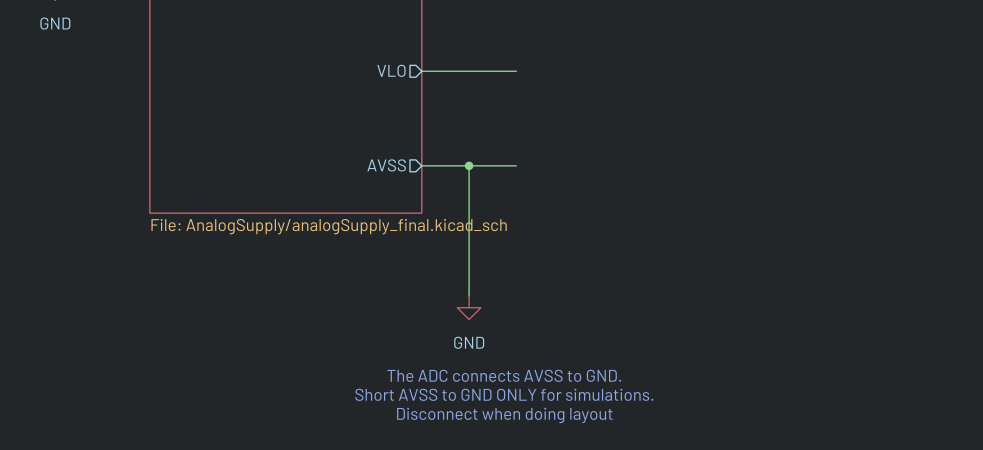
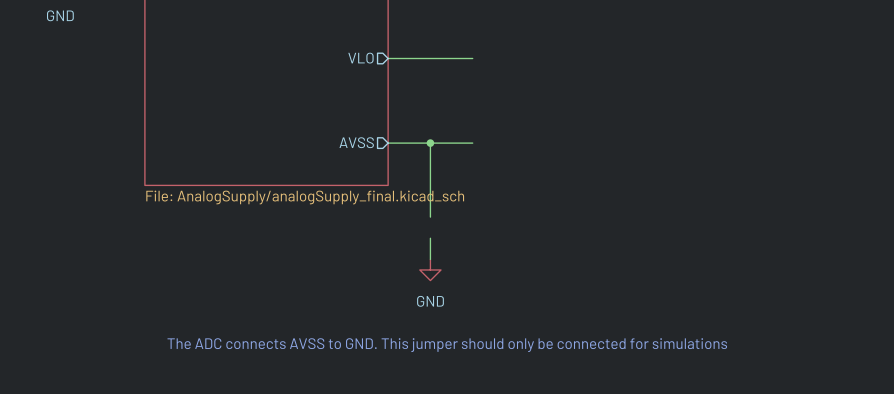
wire: (469, 248) (469, 272) -> none
text: The ADC connects AVSS to GND. (504, 375) -> none
text: none -> The ADC connects AVSS to GND. This jumper should only be connected for simulations (447, 345)
text: Short AVSS to GND ONLY for simulations. (504, 394) -> none
text: Disconnect when doing layout (504, 415) -> none

